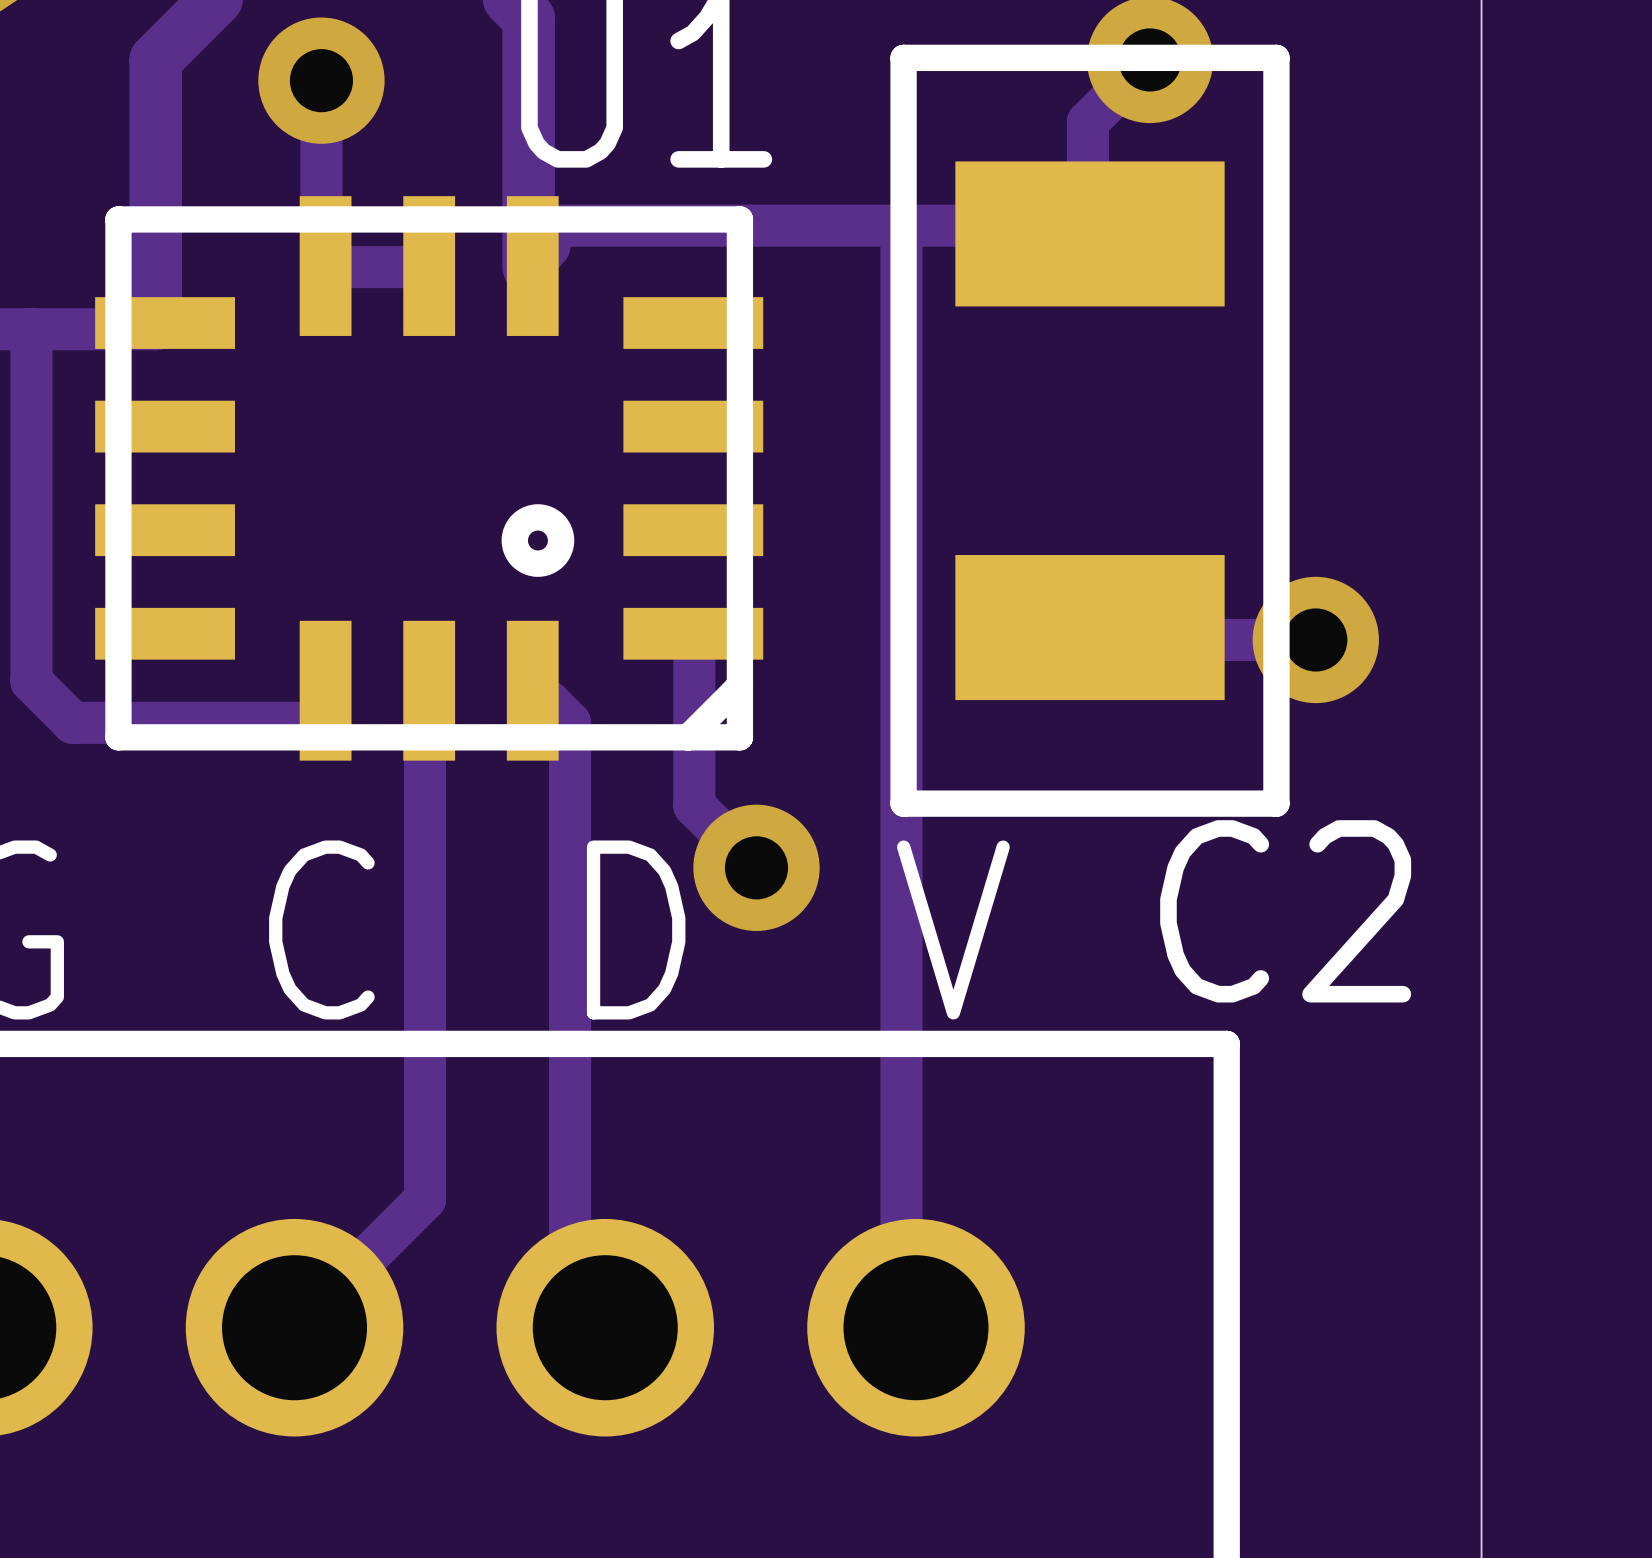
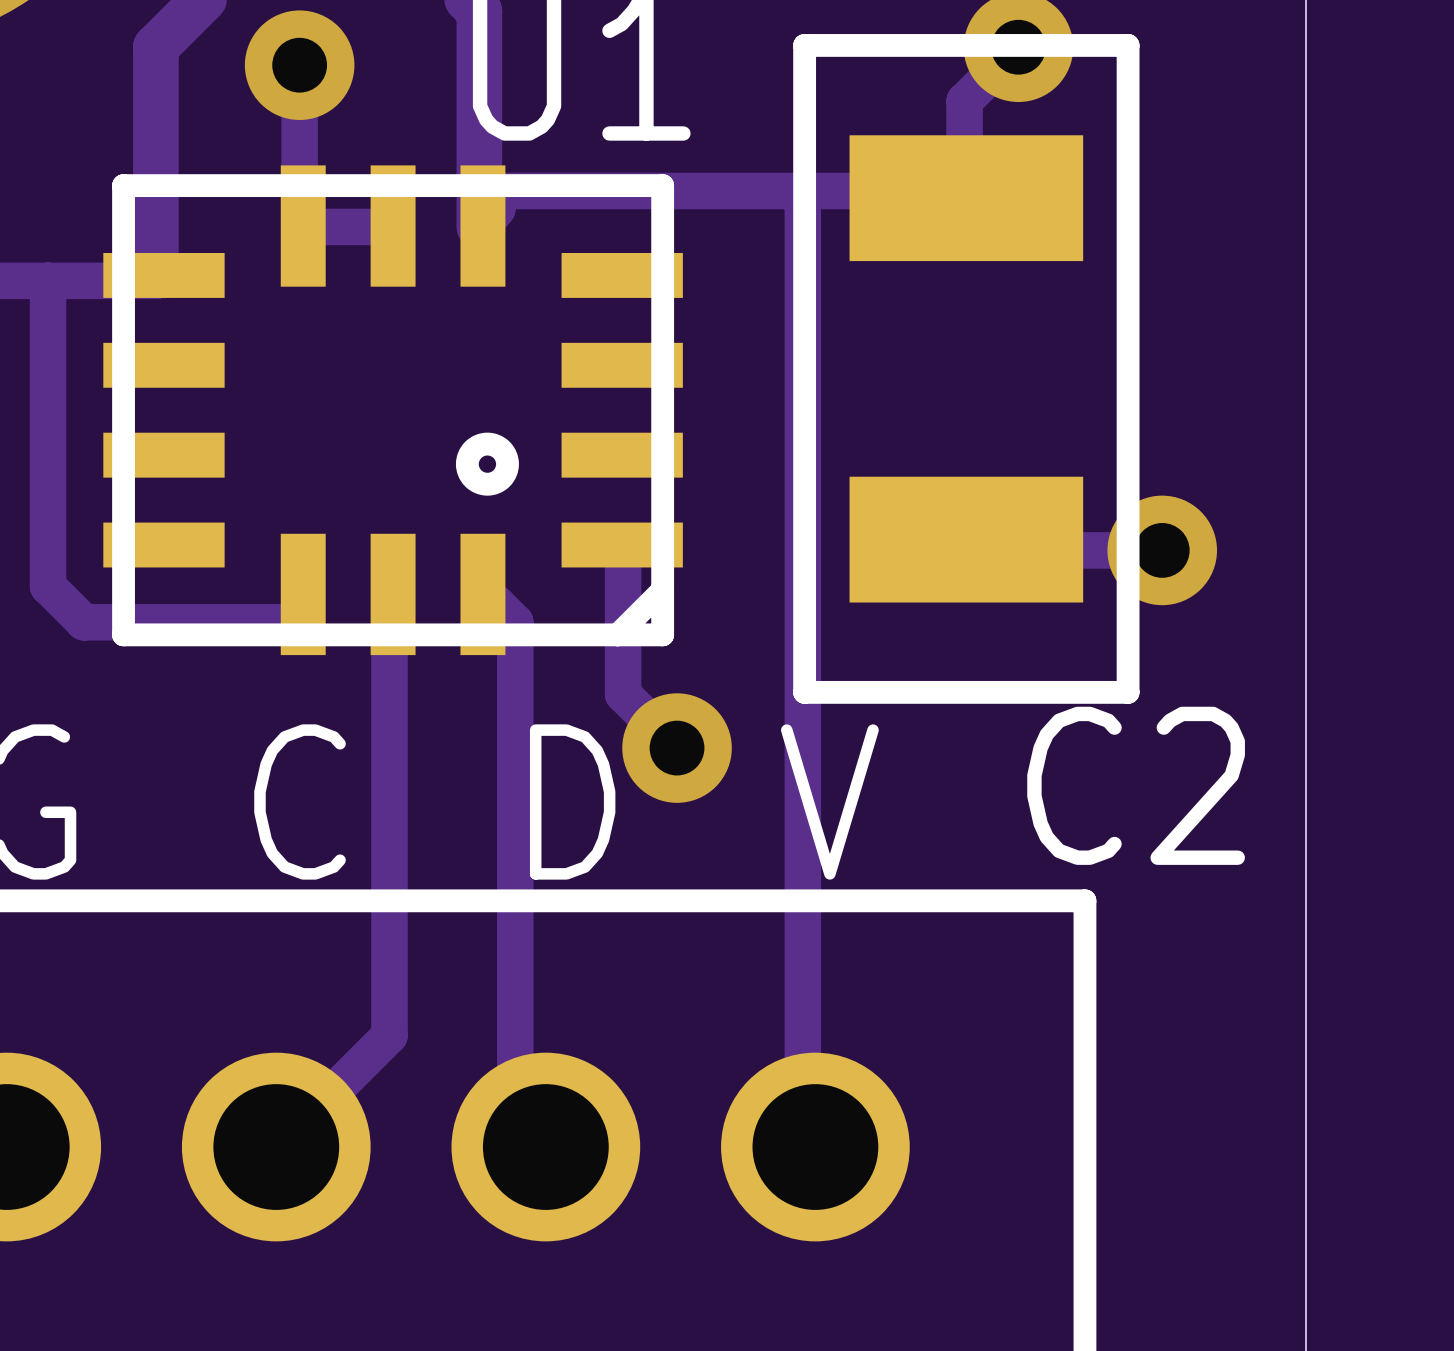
text position: V (953, 929) -> V (829, 801)

